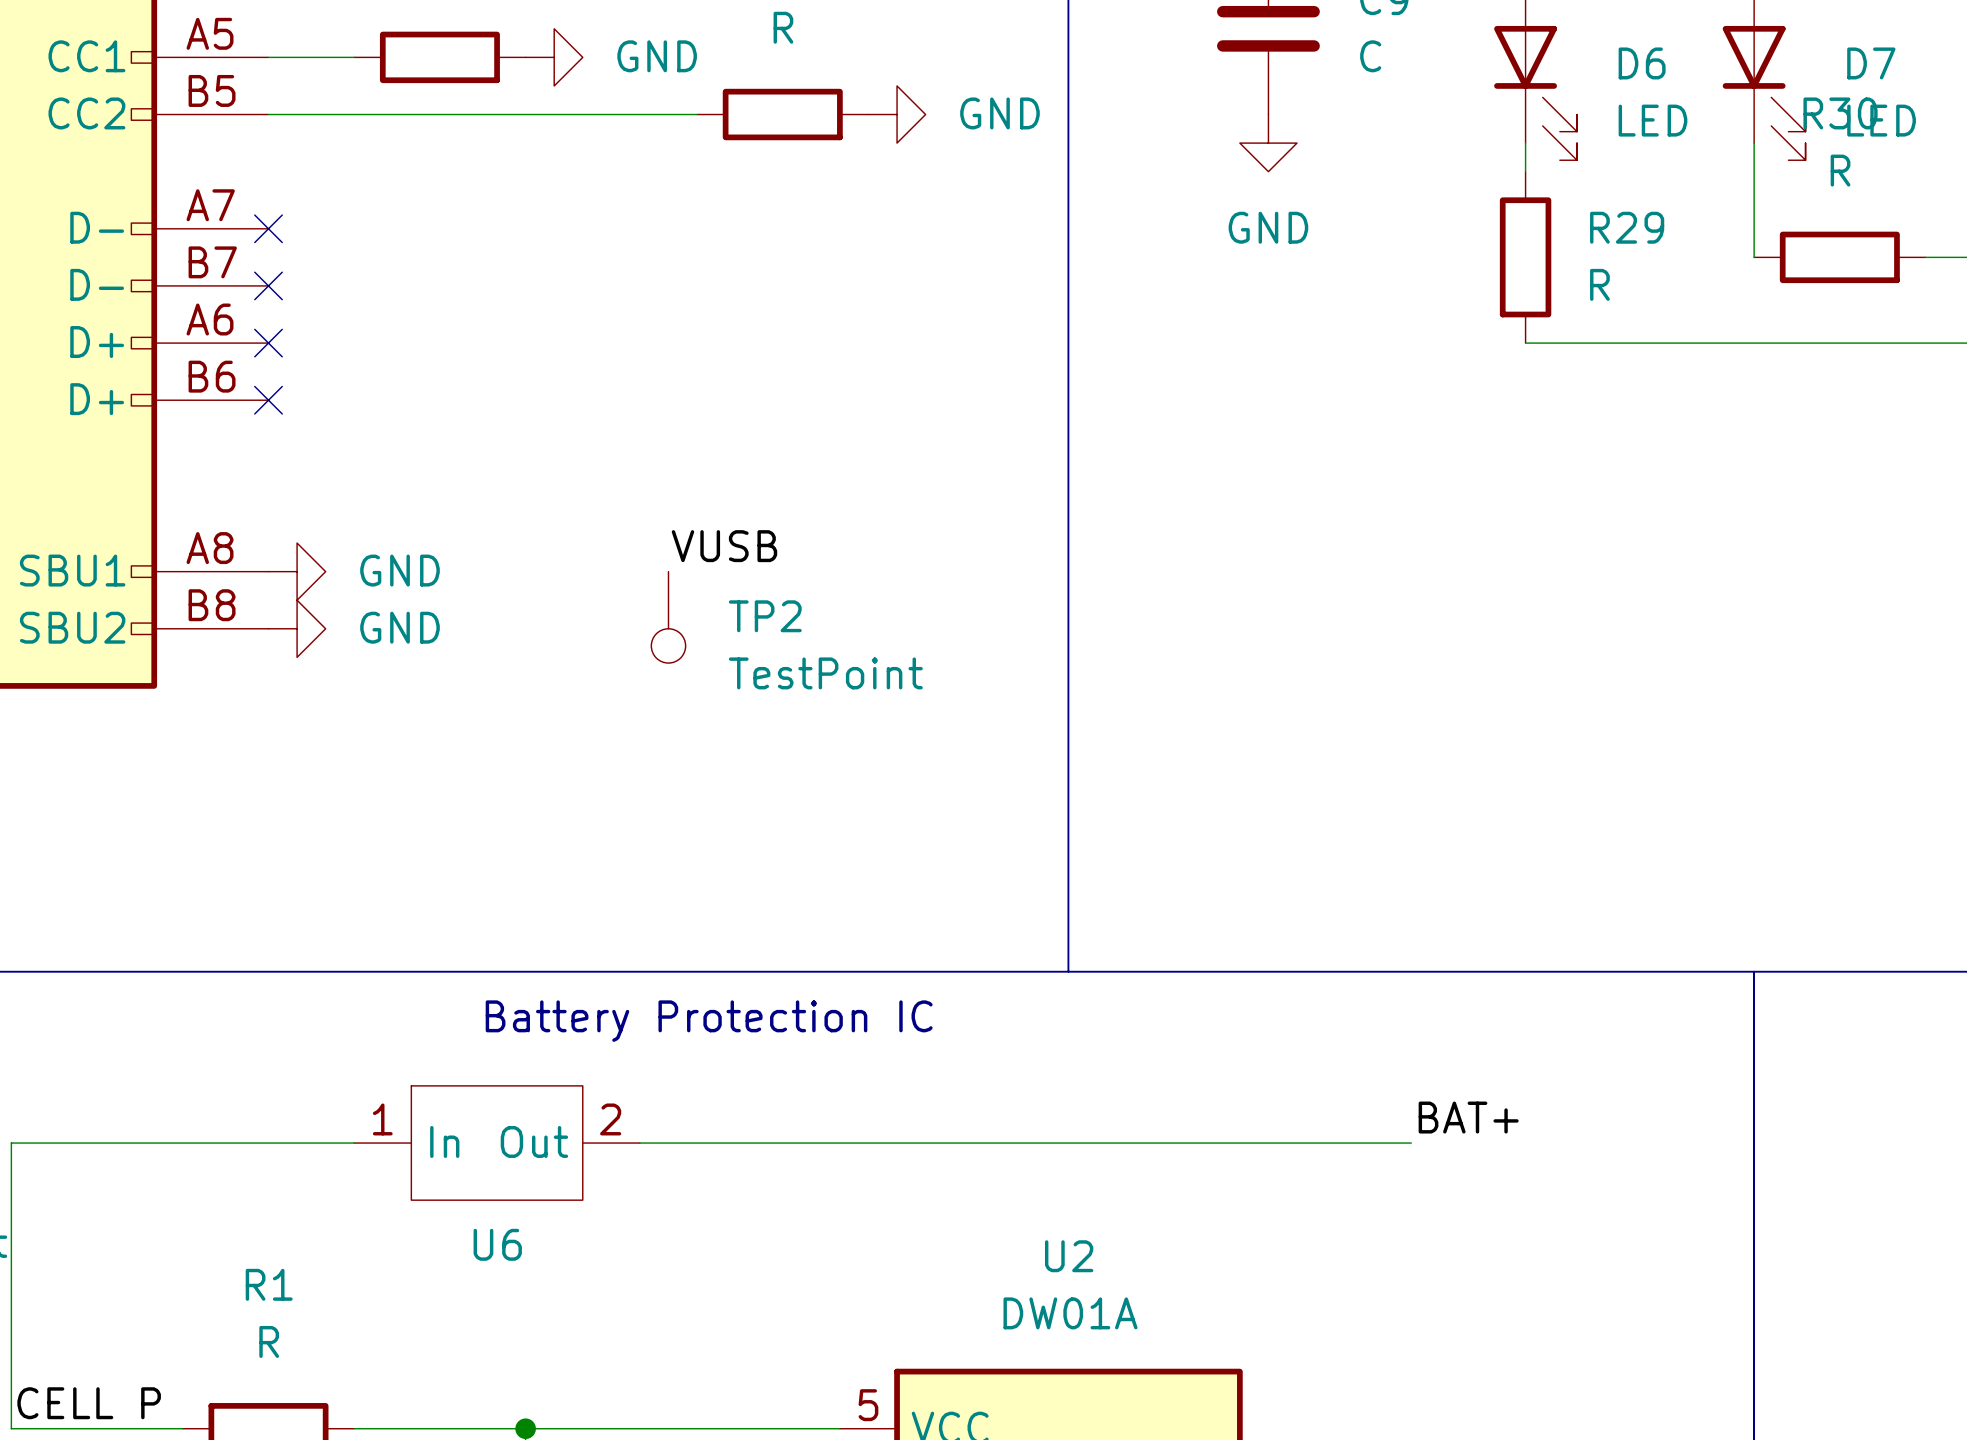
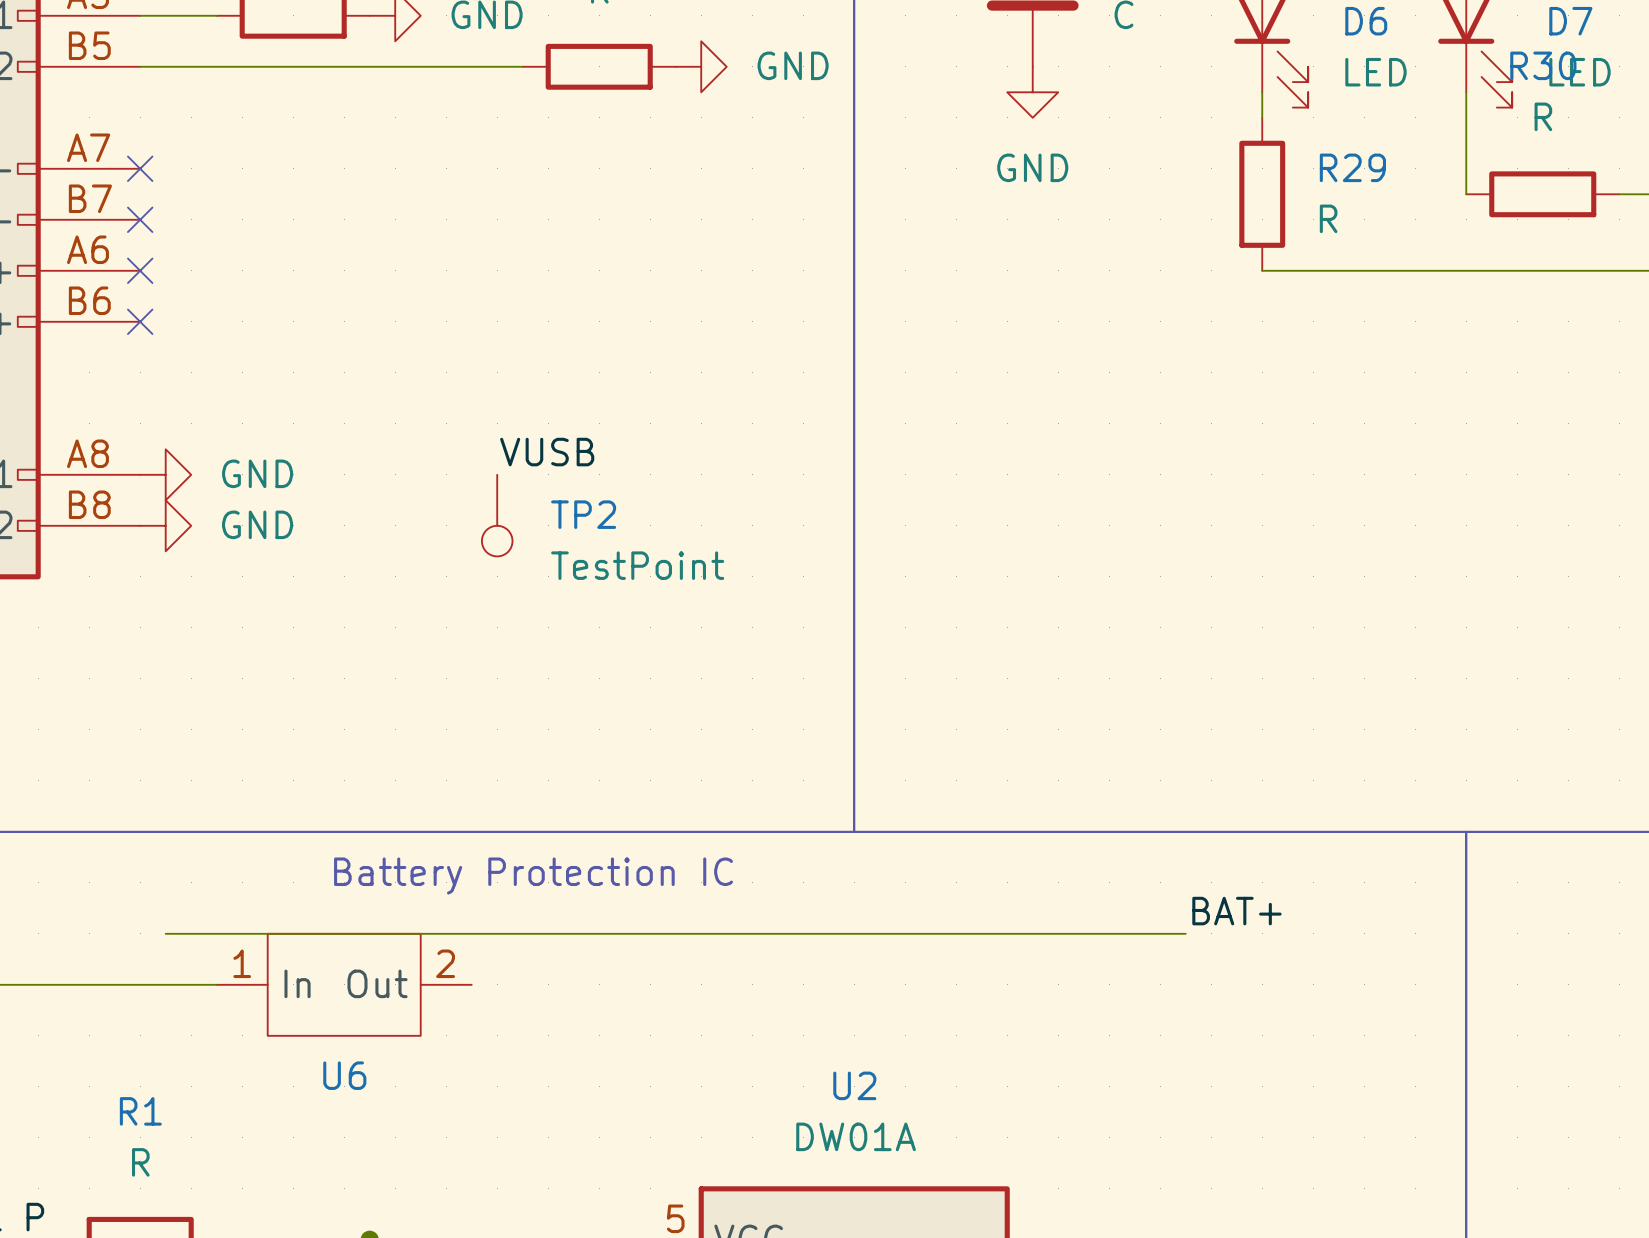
wire: none -> (165, 933) (1185, 933)
label position: BAT+ (1468, 1117) -> BAT+ (1236, 911)
wire: (639, 1143) (1411, 1143) -> none

